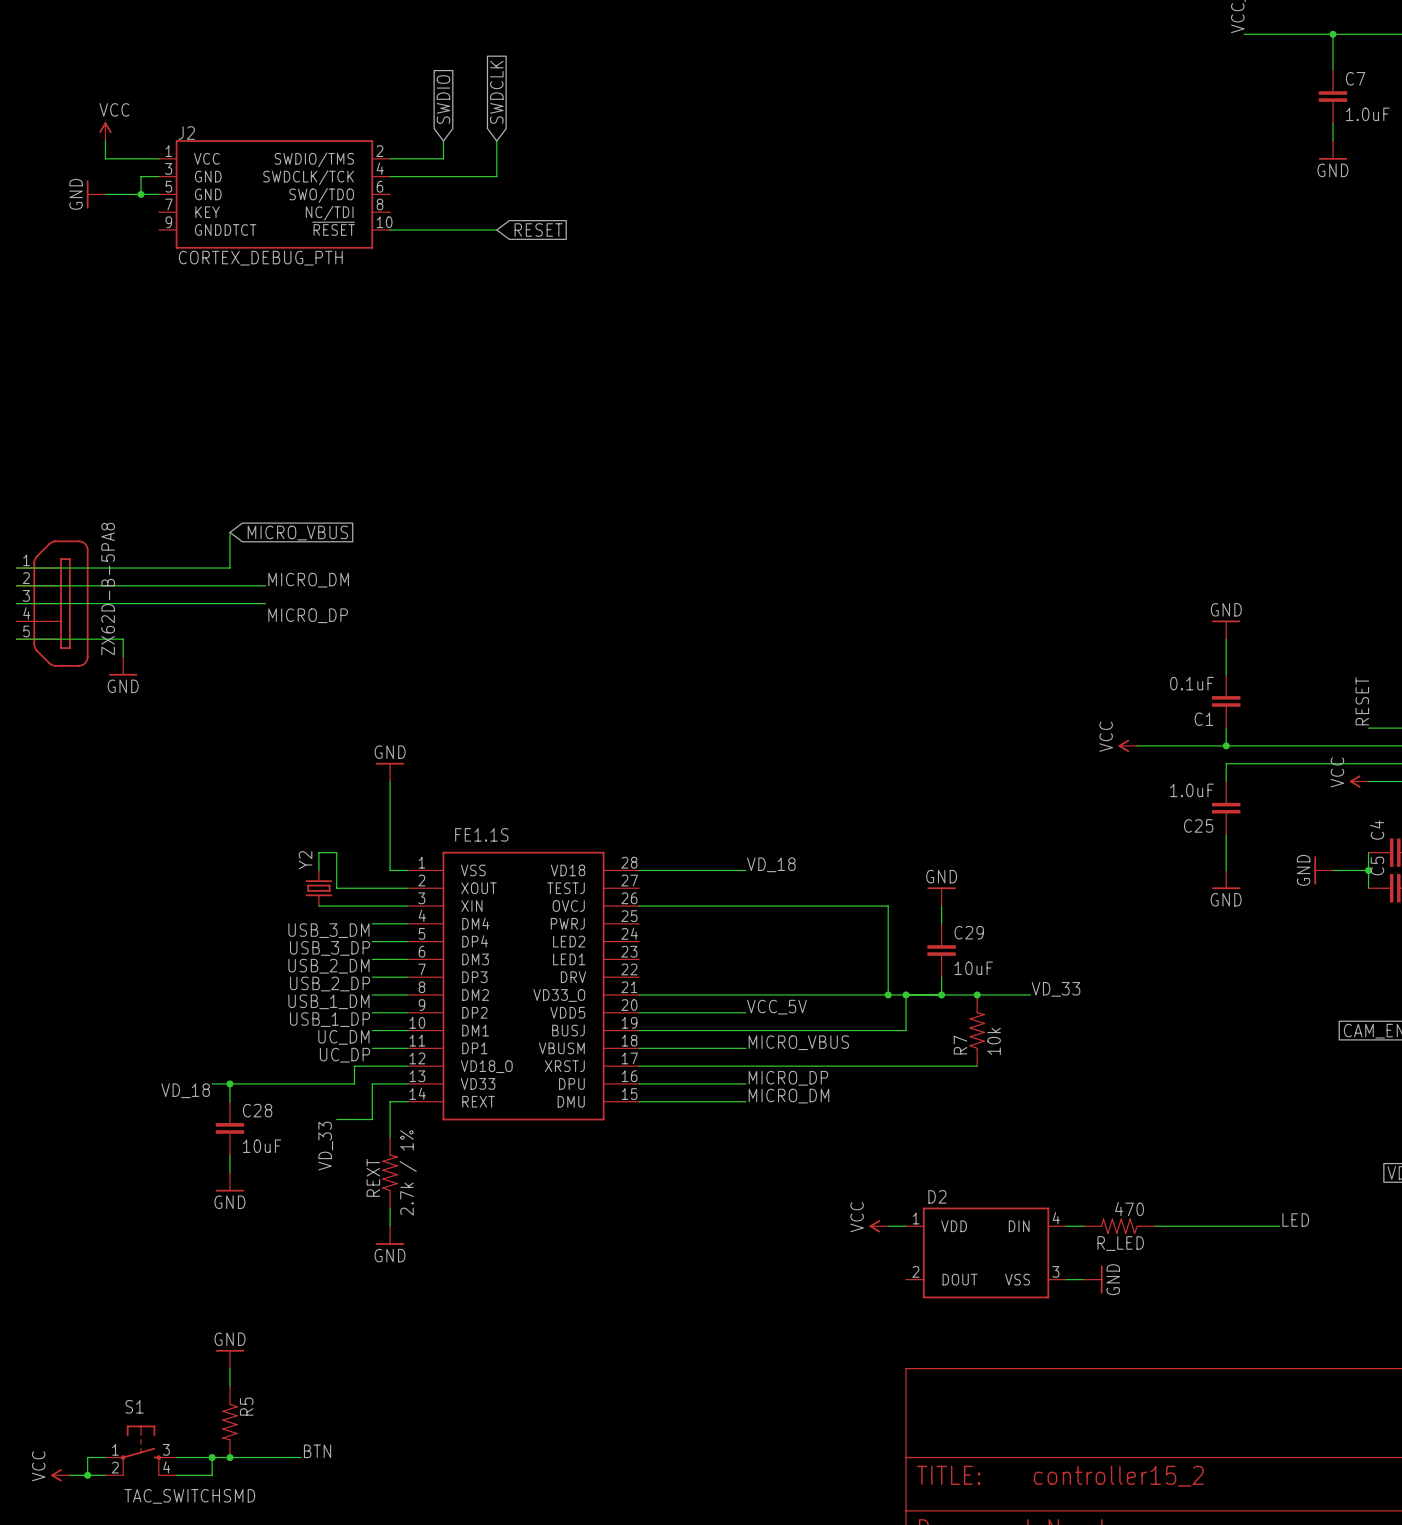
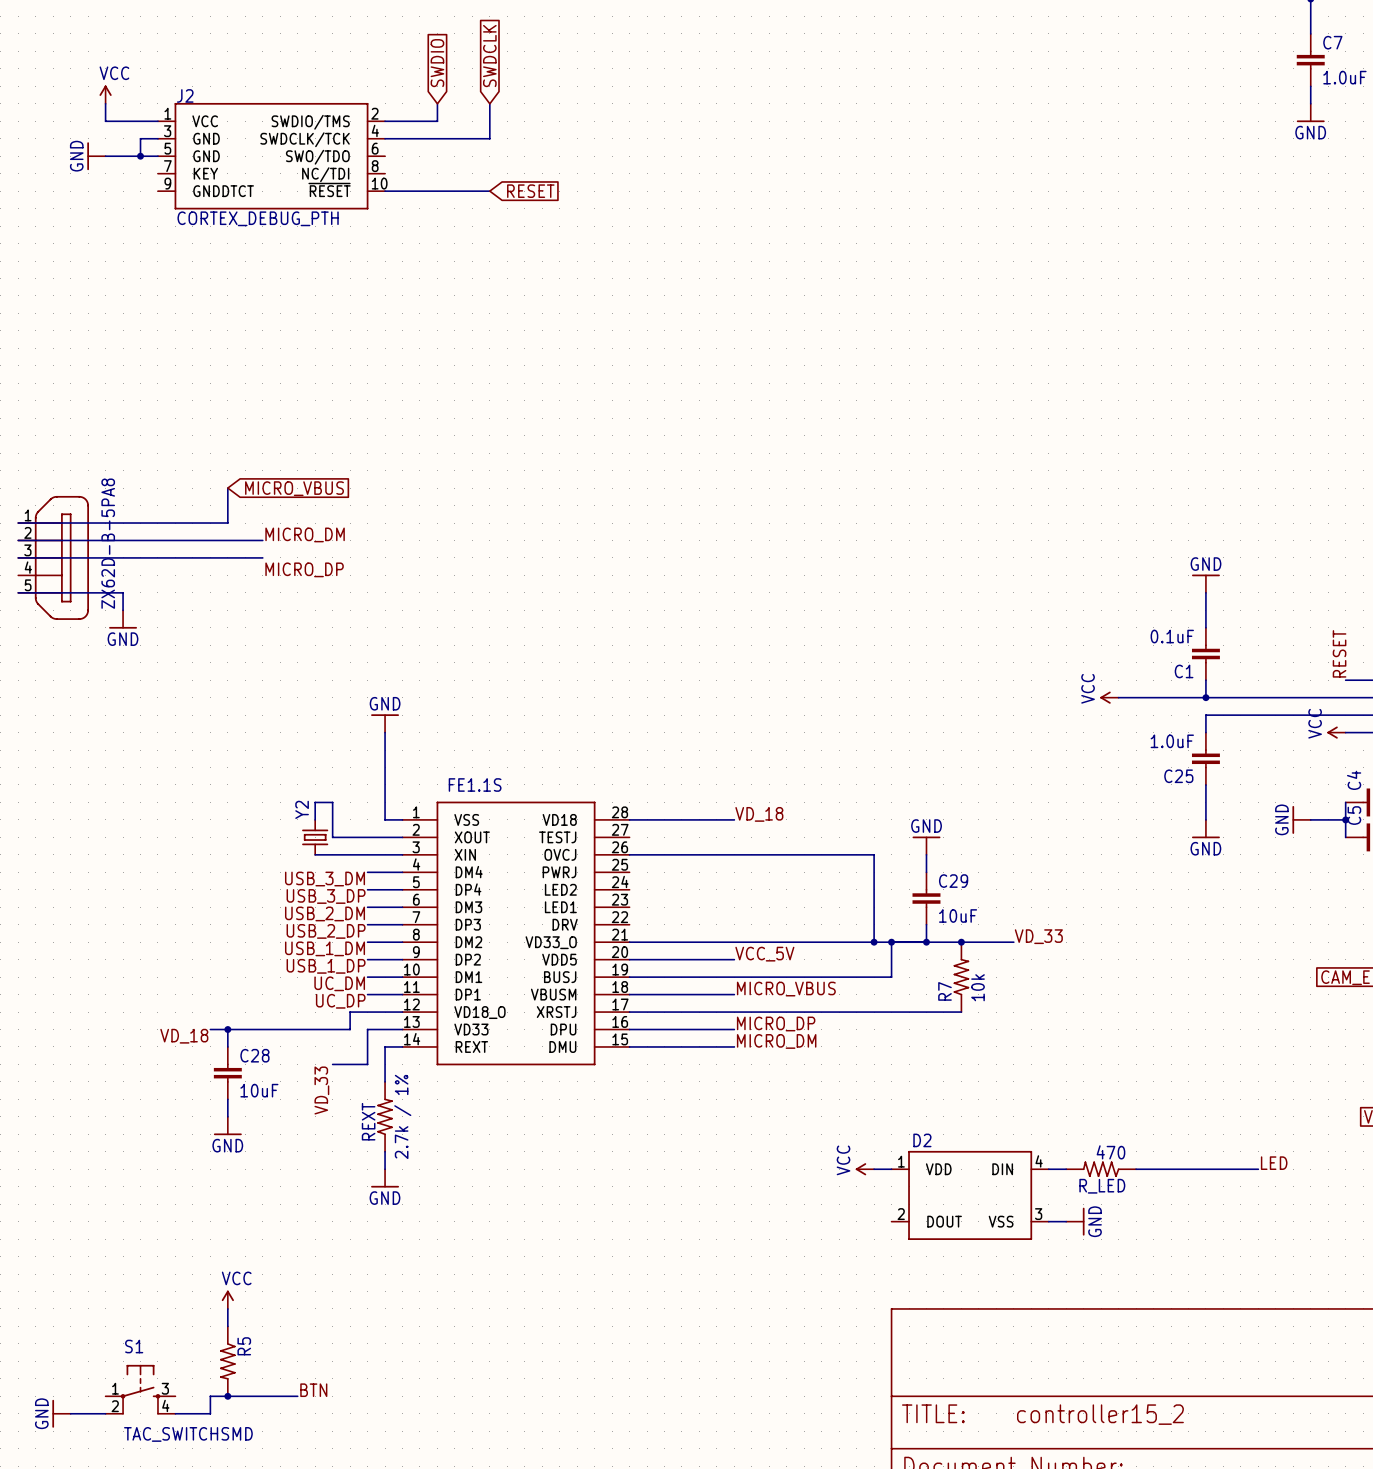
power symbol: GND (229, 1359) -> VCC (227, 1299)
wire: (105, 1457) (87, 1457) (87, 1475) -> none
wire: (176, 1457) (212, 1457) -> none
junction: (212, 1457) -> none
power symbol: VCC (60, 1475) -> GND (61, 1413)
junction: (87, 1475) -> none

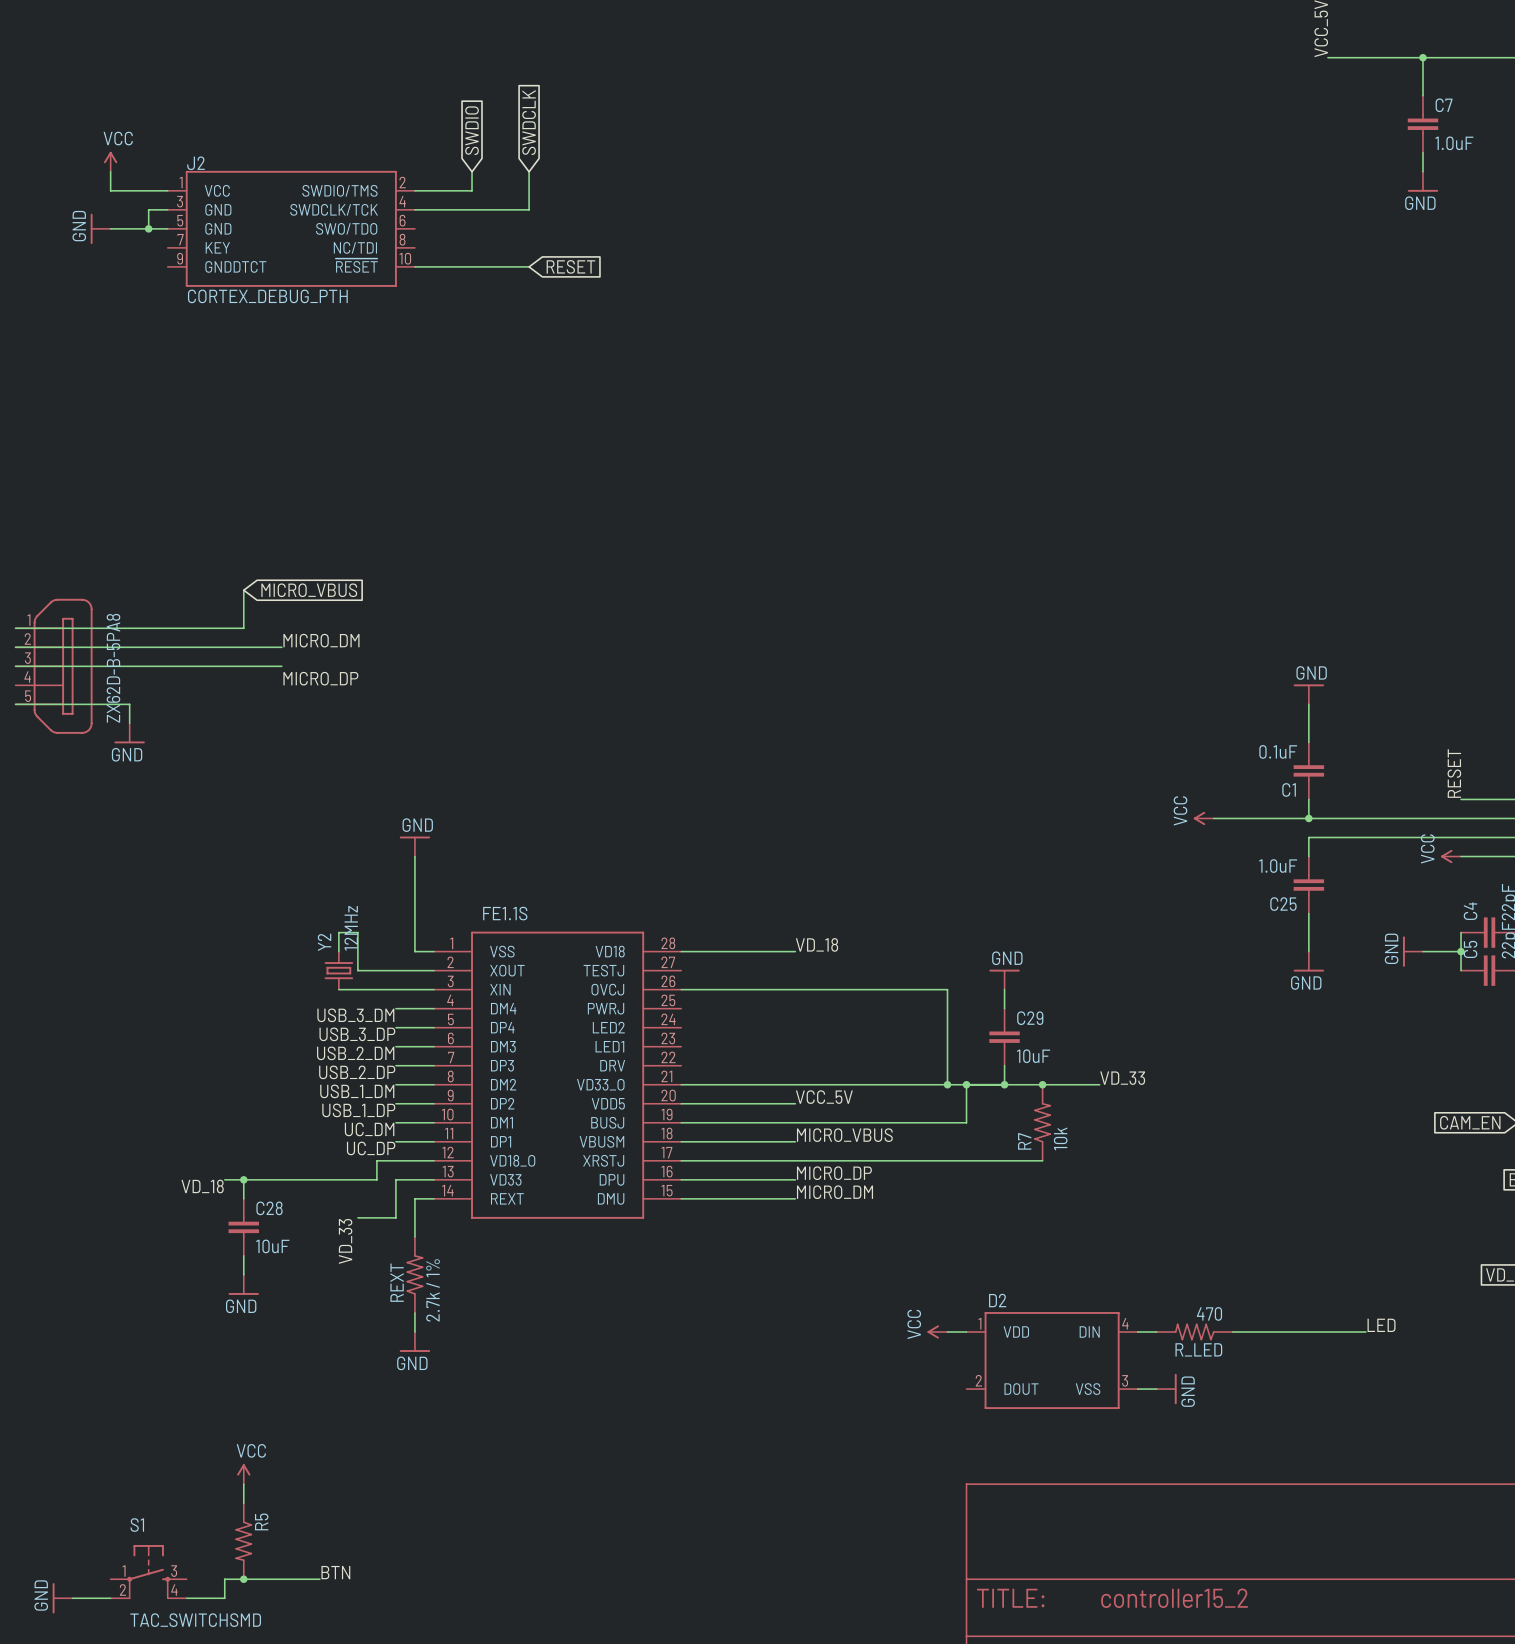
Y2 value: none -> 12MHz (351, 928)

